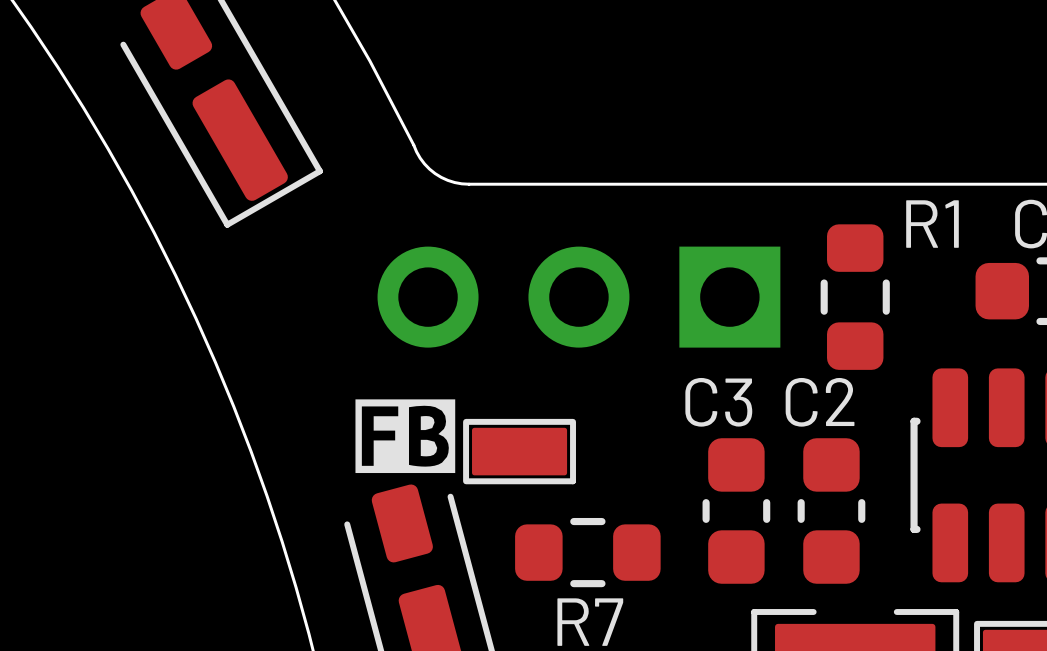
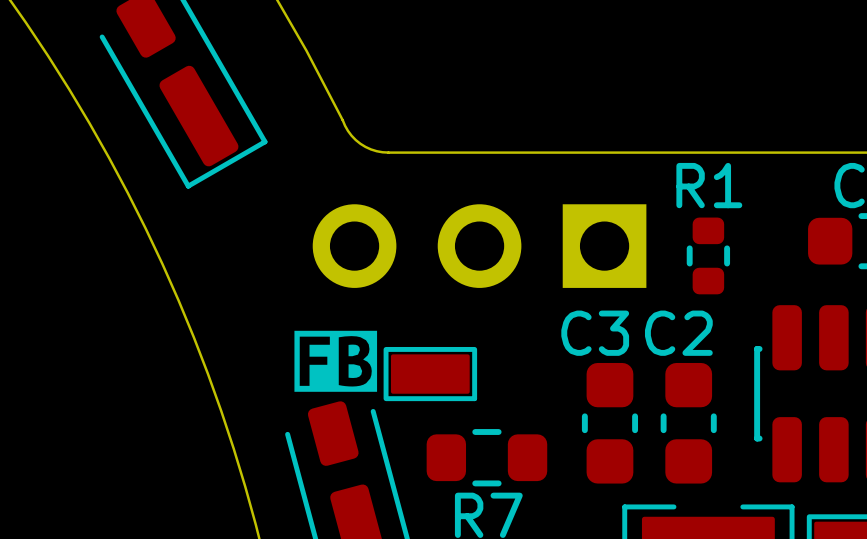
R1 footprint: [820, 224, 890, 370] -> [686, 217, 731, 295]
R1 name position: R1 (932, 224) -> R1 (709, 185)

